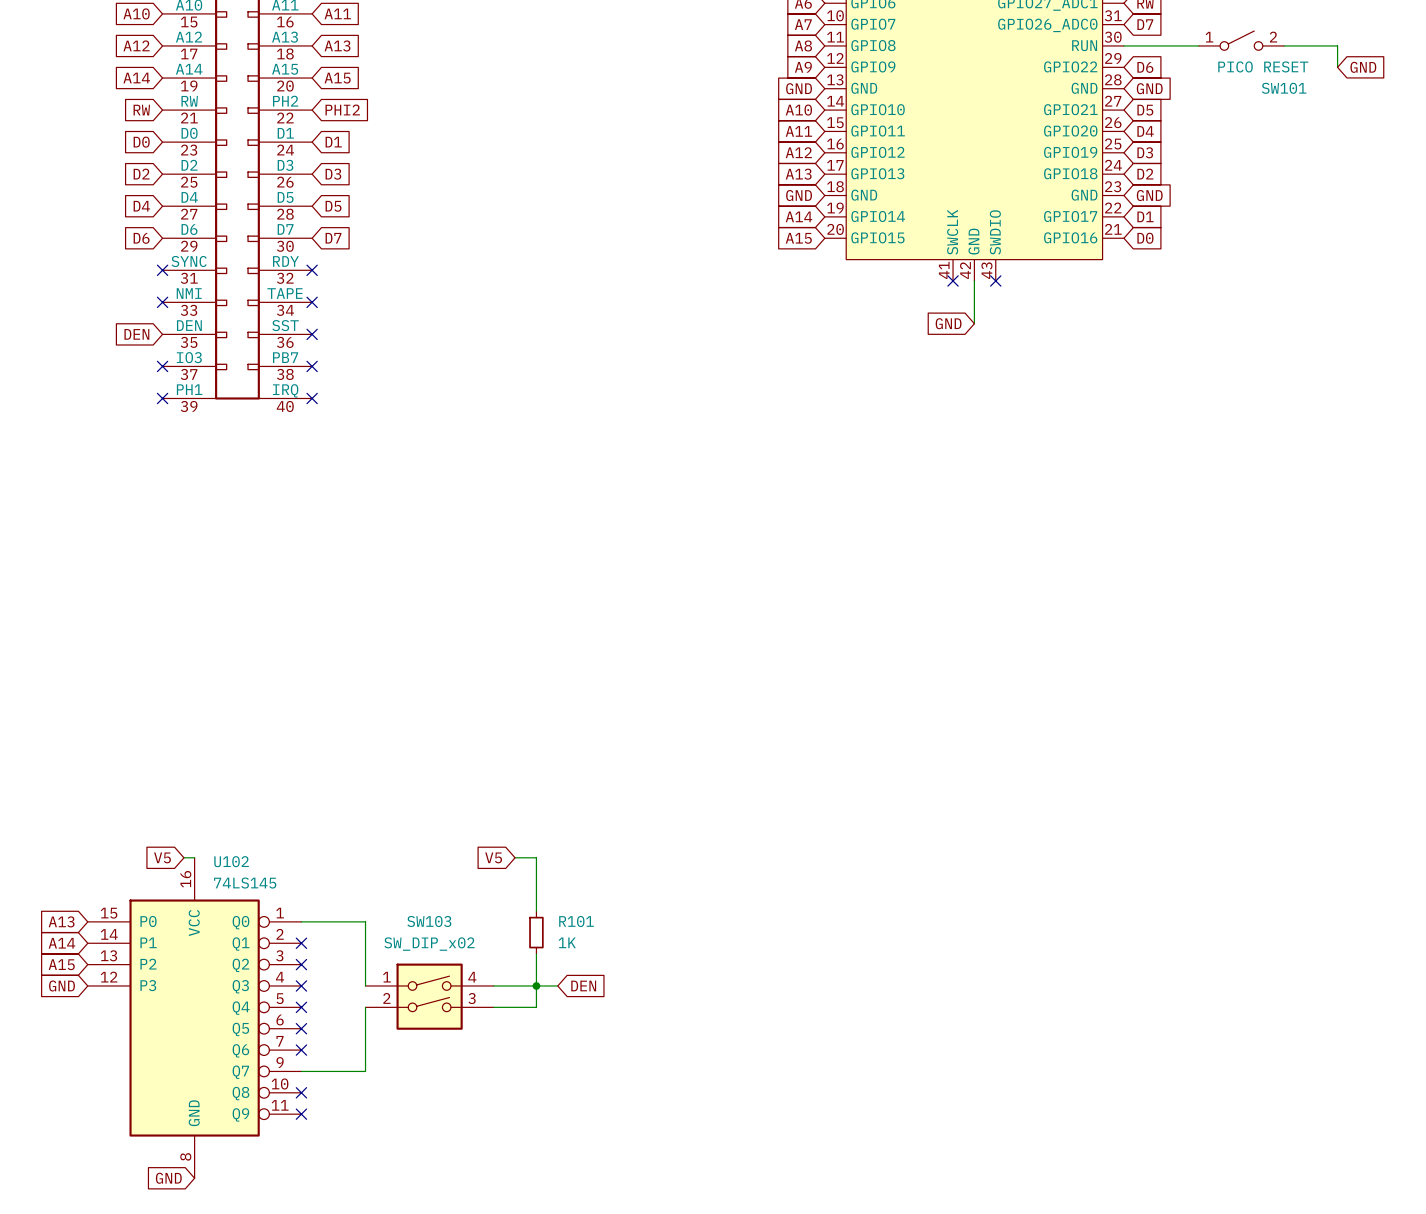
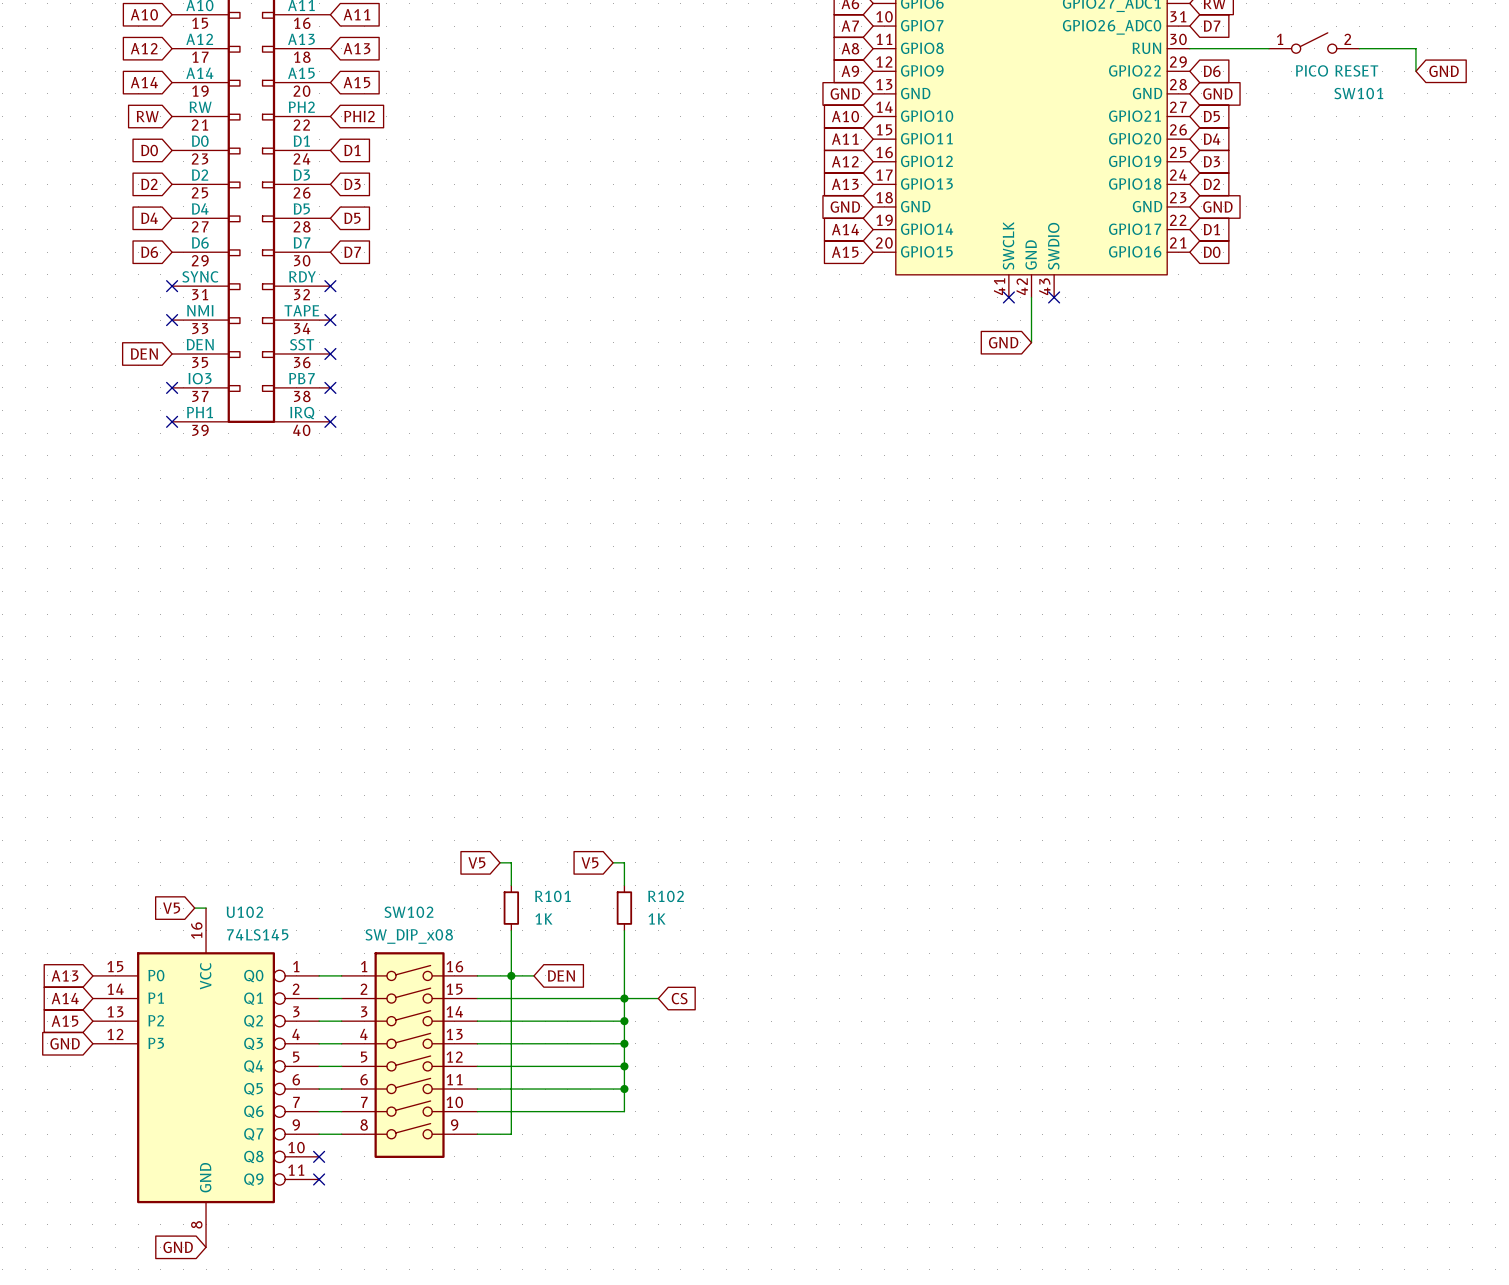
global label: none -> V5 (476, 862)
wire: none -> (500, 862) (511, 862) (511, 885)
global label: none -> V5 (590, 862)
wire: none -> (613, 862) (624, 862) (624, 885)
global label: V5 (493, 857) -> none
wire: (515, 857) (536, 857) (536, 911) -> none
R102: none -> 1K (624, 908)
wire: none -> (511, 930) (511, 1134) (477, 1134)
wire: none -> (624, 930) (624, 1111) (477, 1111)
wire: none -> (477, 975) (533, 975)
junction: none -> (511, 975)
R101 position: (536, 932) -> (511, 908)
wire: none -> (319, 998) (341, 998)
no-connect mark: (301, 943) -> none
wire: none -> (477, 998) (658, 998)
junction: none -> (624, 998)
global label: none -> CS (679, 998)
wire: (536, 953) (536, 1007) -> (624, 1066) (567, 1066)
wire: none -> (319, 1021) (341, 1021)
no-connect mark: (301, 964) -> none
wire: none -> (477, 1021) (624, 1021)
junction: none -> (624, 1021)
wire: none -> (319, 1043) (341, 1043)
no-connect mark: (301, 985) -> none
junction: (536, 985) -> none
wire: none -> (590, 1043) (624, 1043)
global label position: DEN (583, 985) -> DEN (561, 975)
junction: none -> (624, 1043)
SW102: none -> SW_DIP_x08 (409, 1055)
SW103: SW_DIP_x02 (429, 996) -> none
wire: none -> (319, 1066) (341, 1066)
no-connect mark: (301, 1007) -> none
junction: none -> (624, 1066)
wire: none -> (319, 1089) (341, 1089)
no-connect mark: (301, 1028) -> none
wire: none -> (477, 1089) (624, 1089)
junction: none -> (624, 1089)
wire: none -> (319, 1111) (341, 1111)
no-connect mark: (301, 1050) -> none

